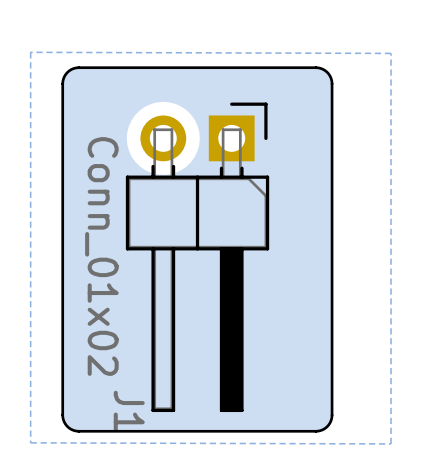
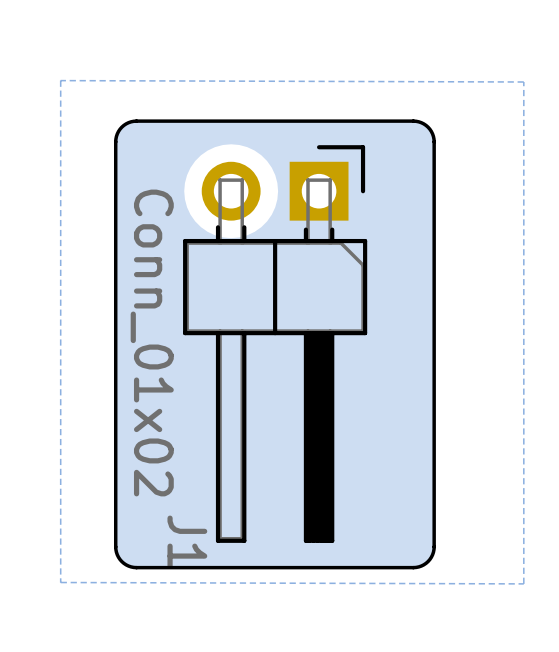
board edge: (305, 431) (323, 429) (329, 423) (332, 415) (332, 83) (327, 72) (315, 67) (78, 67) (70, 69) (64, 75) (62, 83) (62, 417) (64, 423) (70, 429) (89, 431) -> (413, 567) (421, 566) (428, 561) (432, 554) (434, 546) (434, 141) (432, 133) (428, 127) (421, 122) (413, 121) (136, 121) (126, 123) (118, 131) (115, 141) (115, 546) (117, 554) (121, 561) (128, 566) (136, 567)

